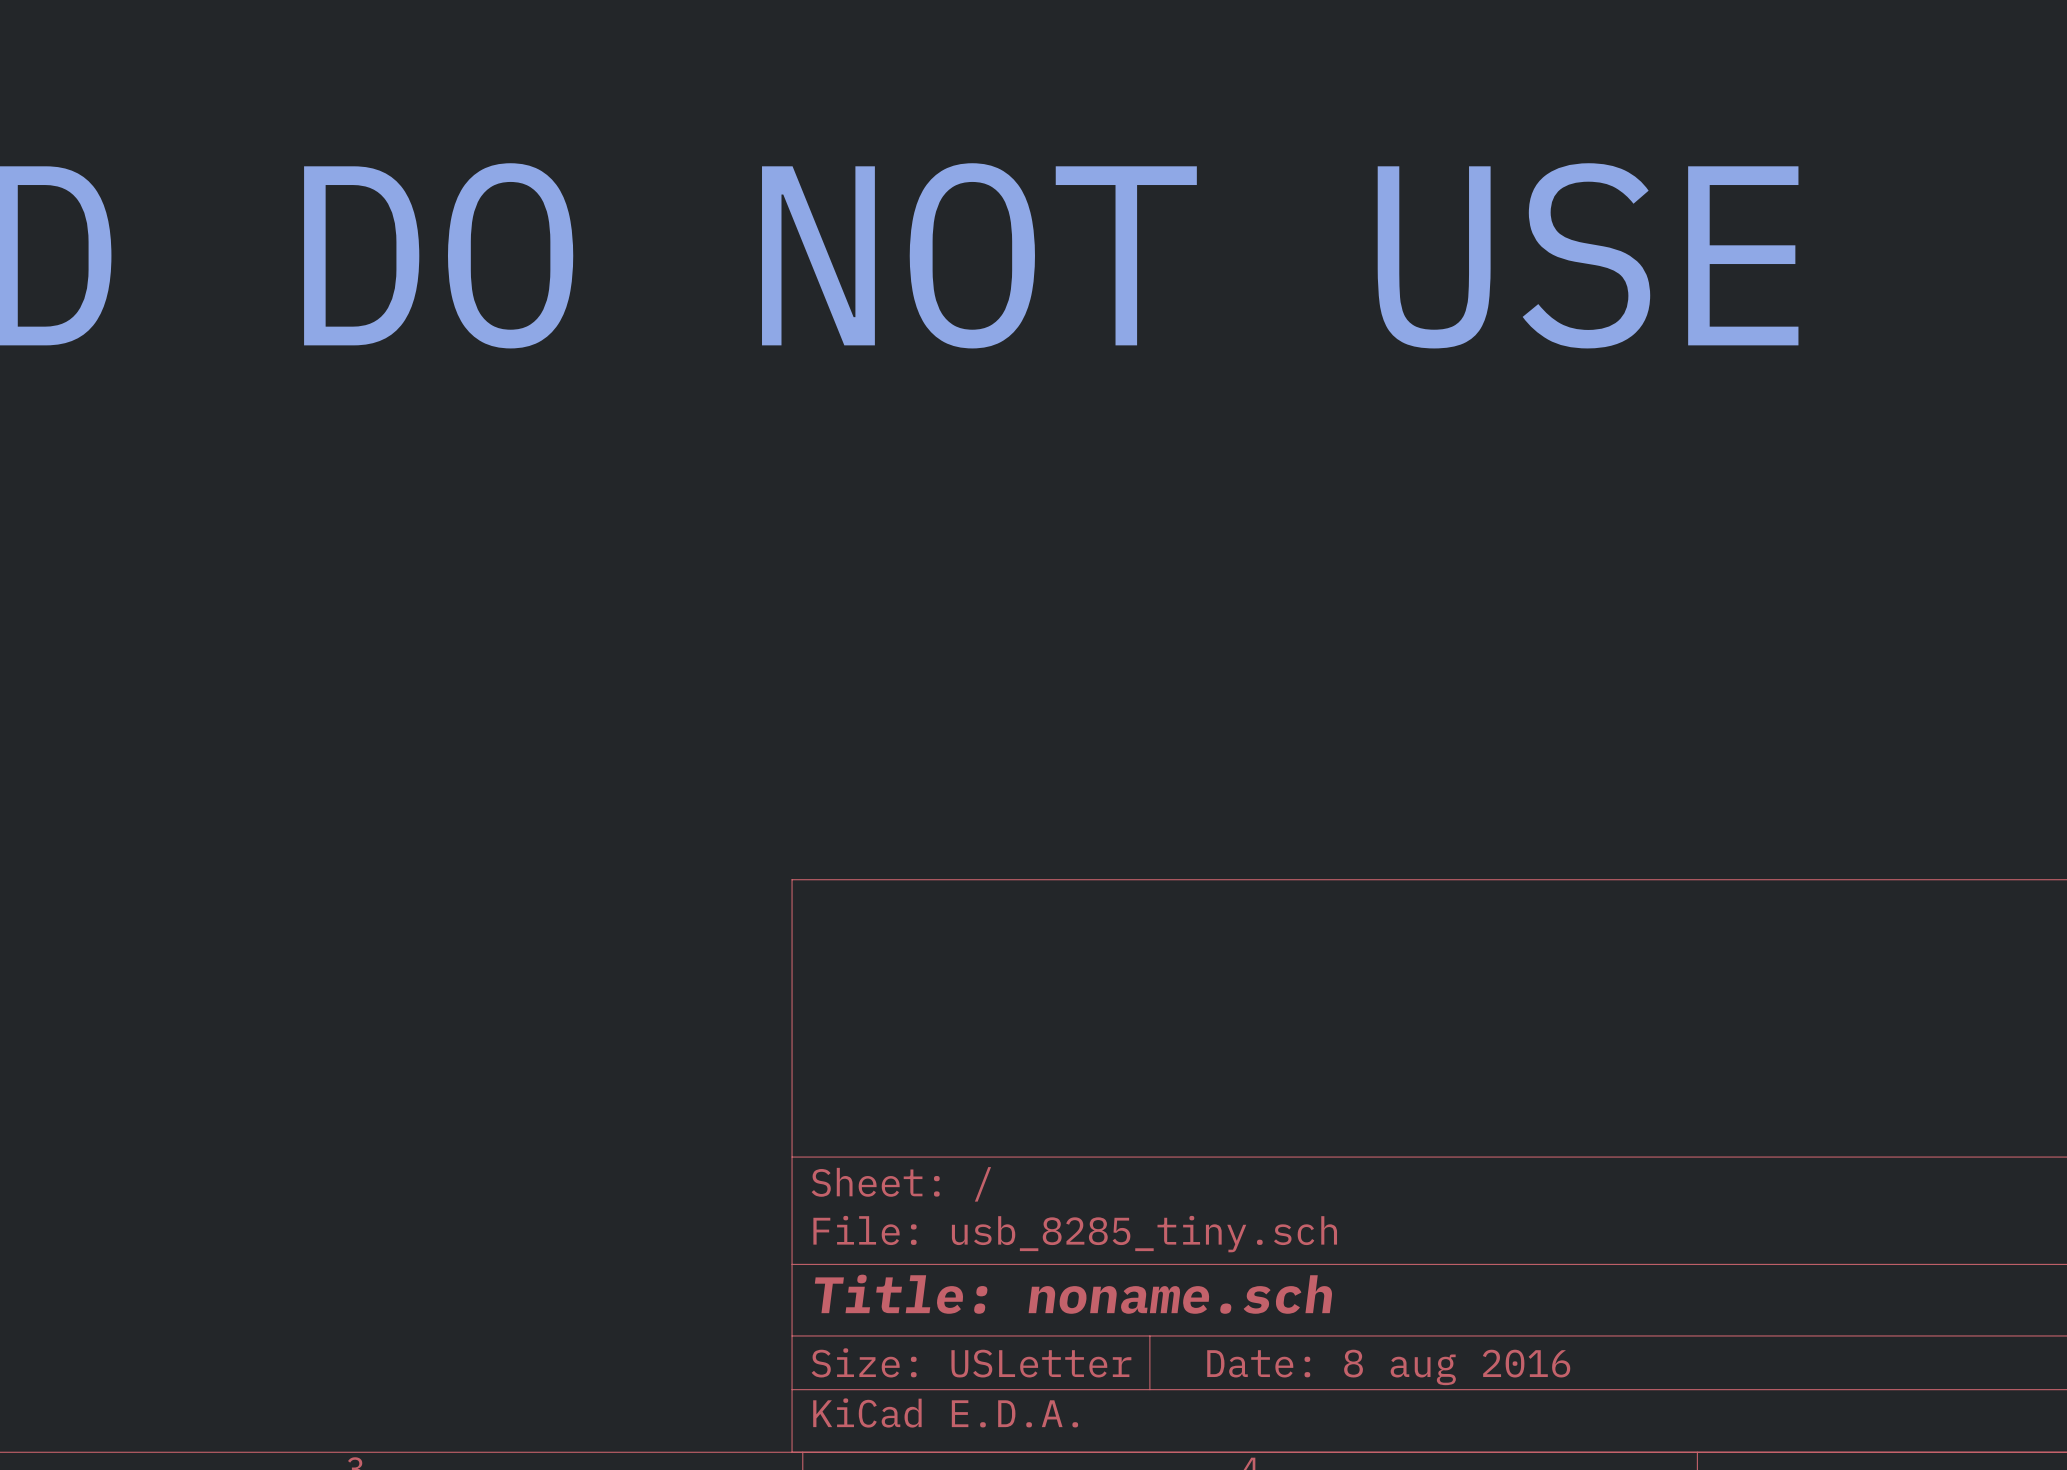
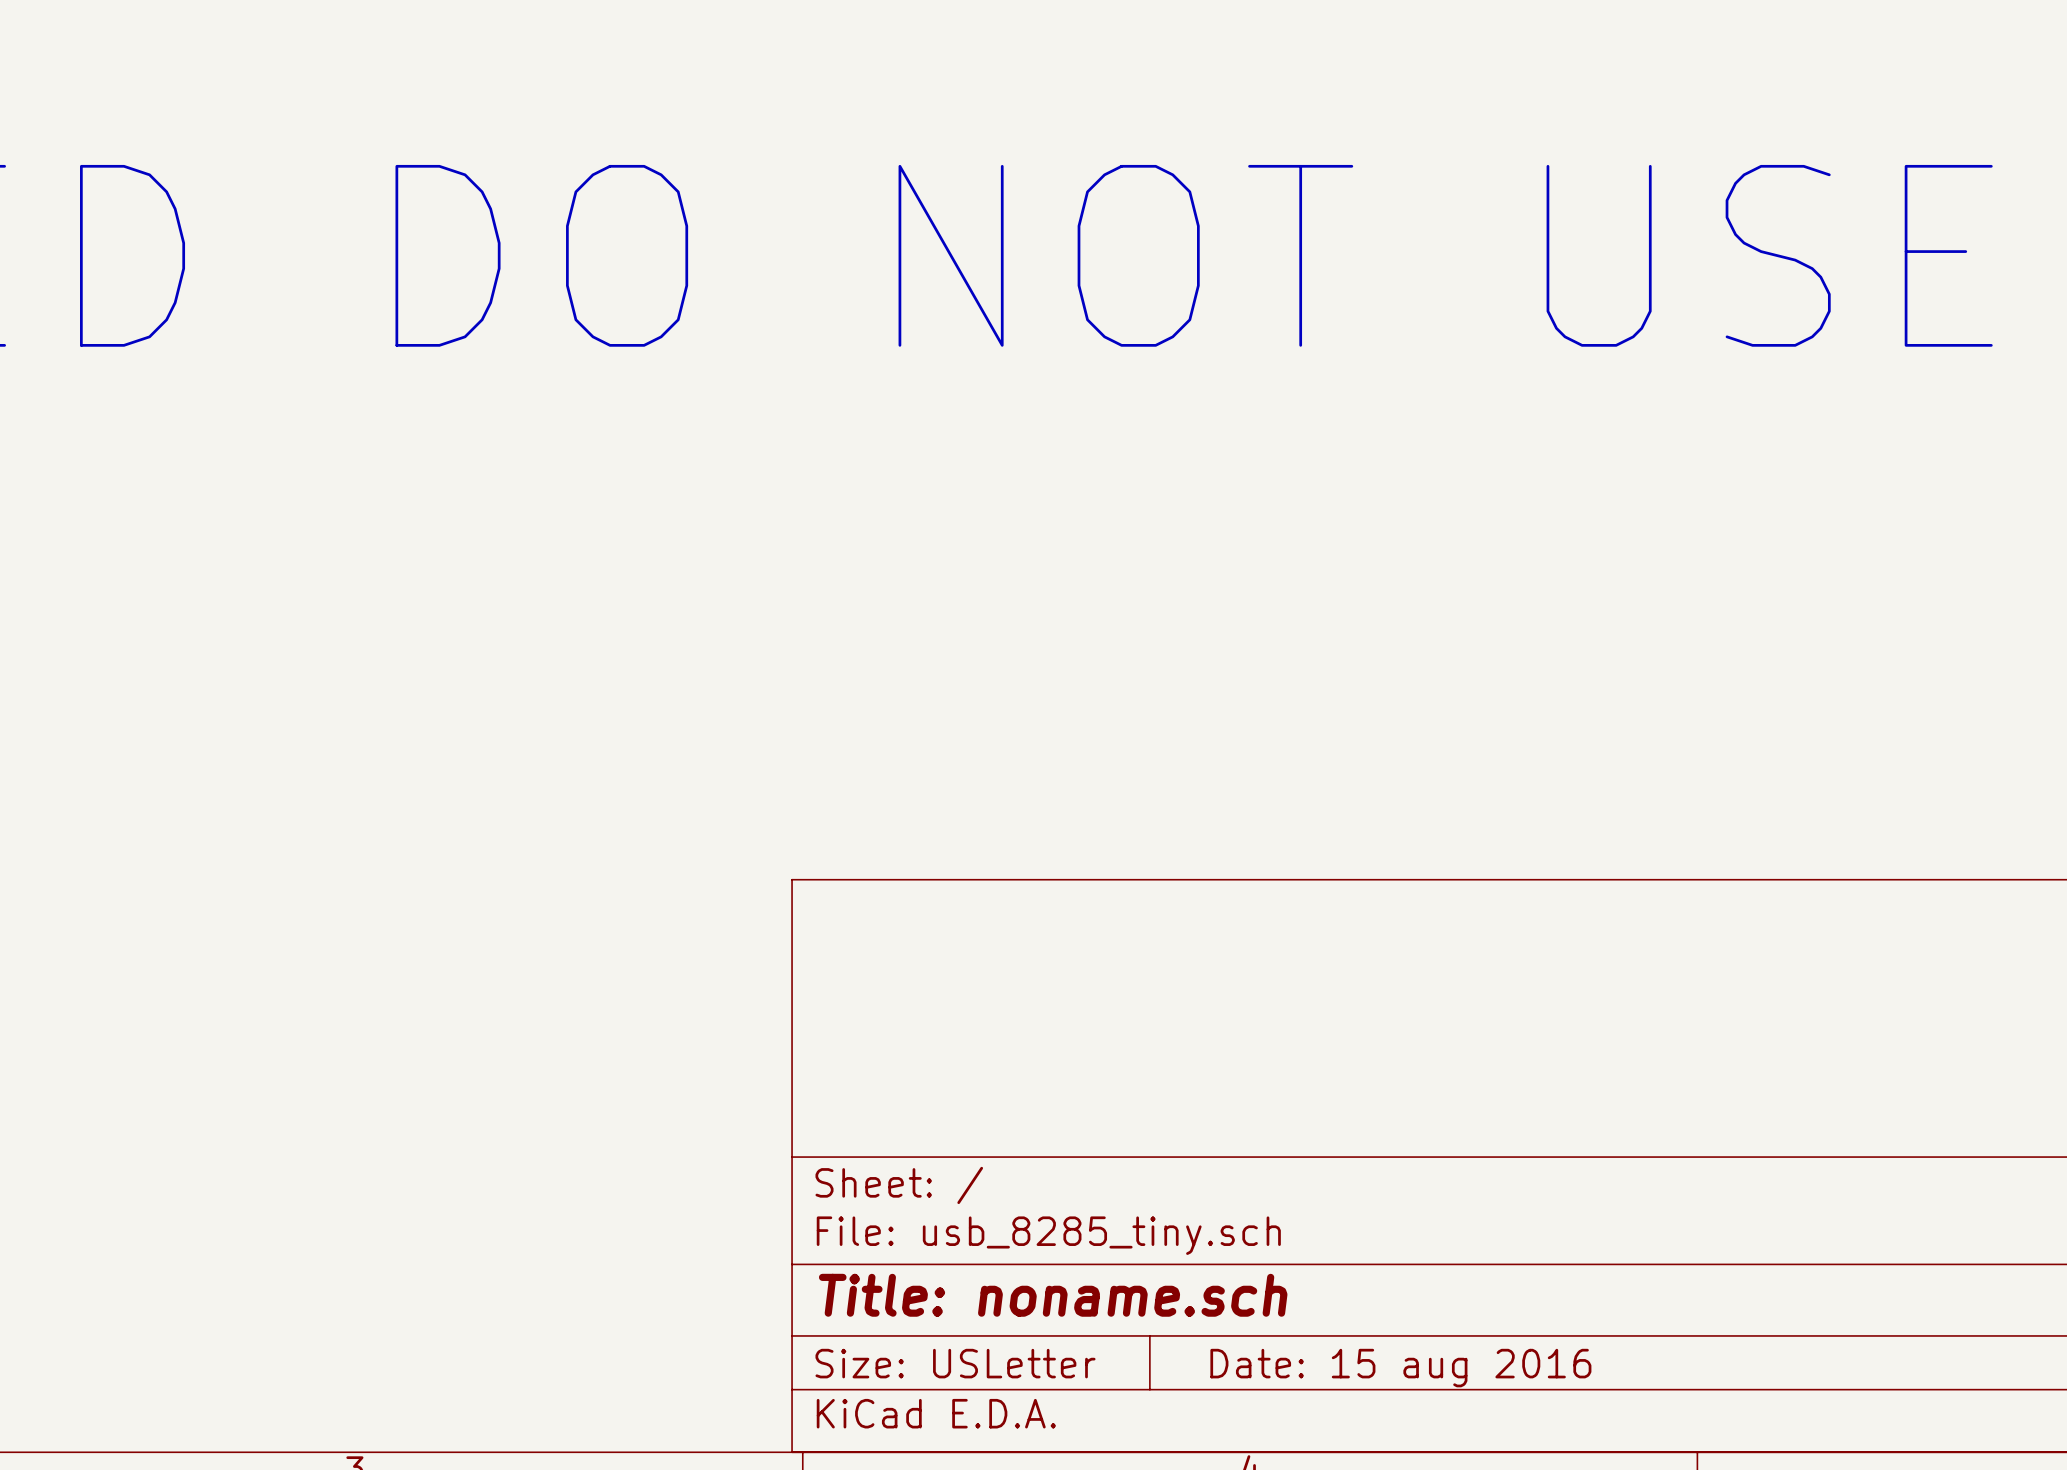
title block: Date: 8 aug 2016 (1388, 1367) -> Date: 15 aug 2016 (1400, 1368)

